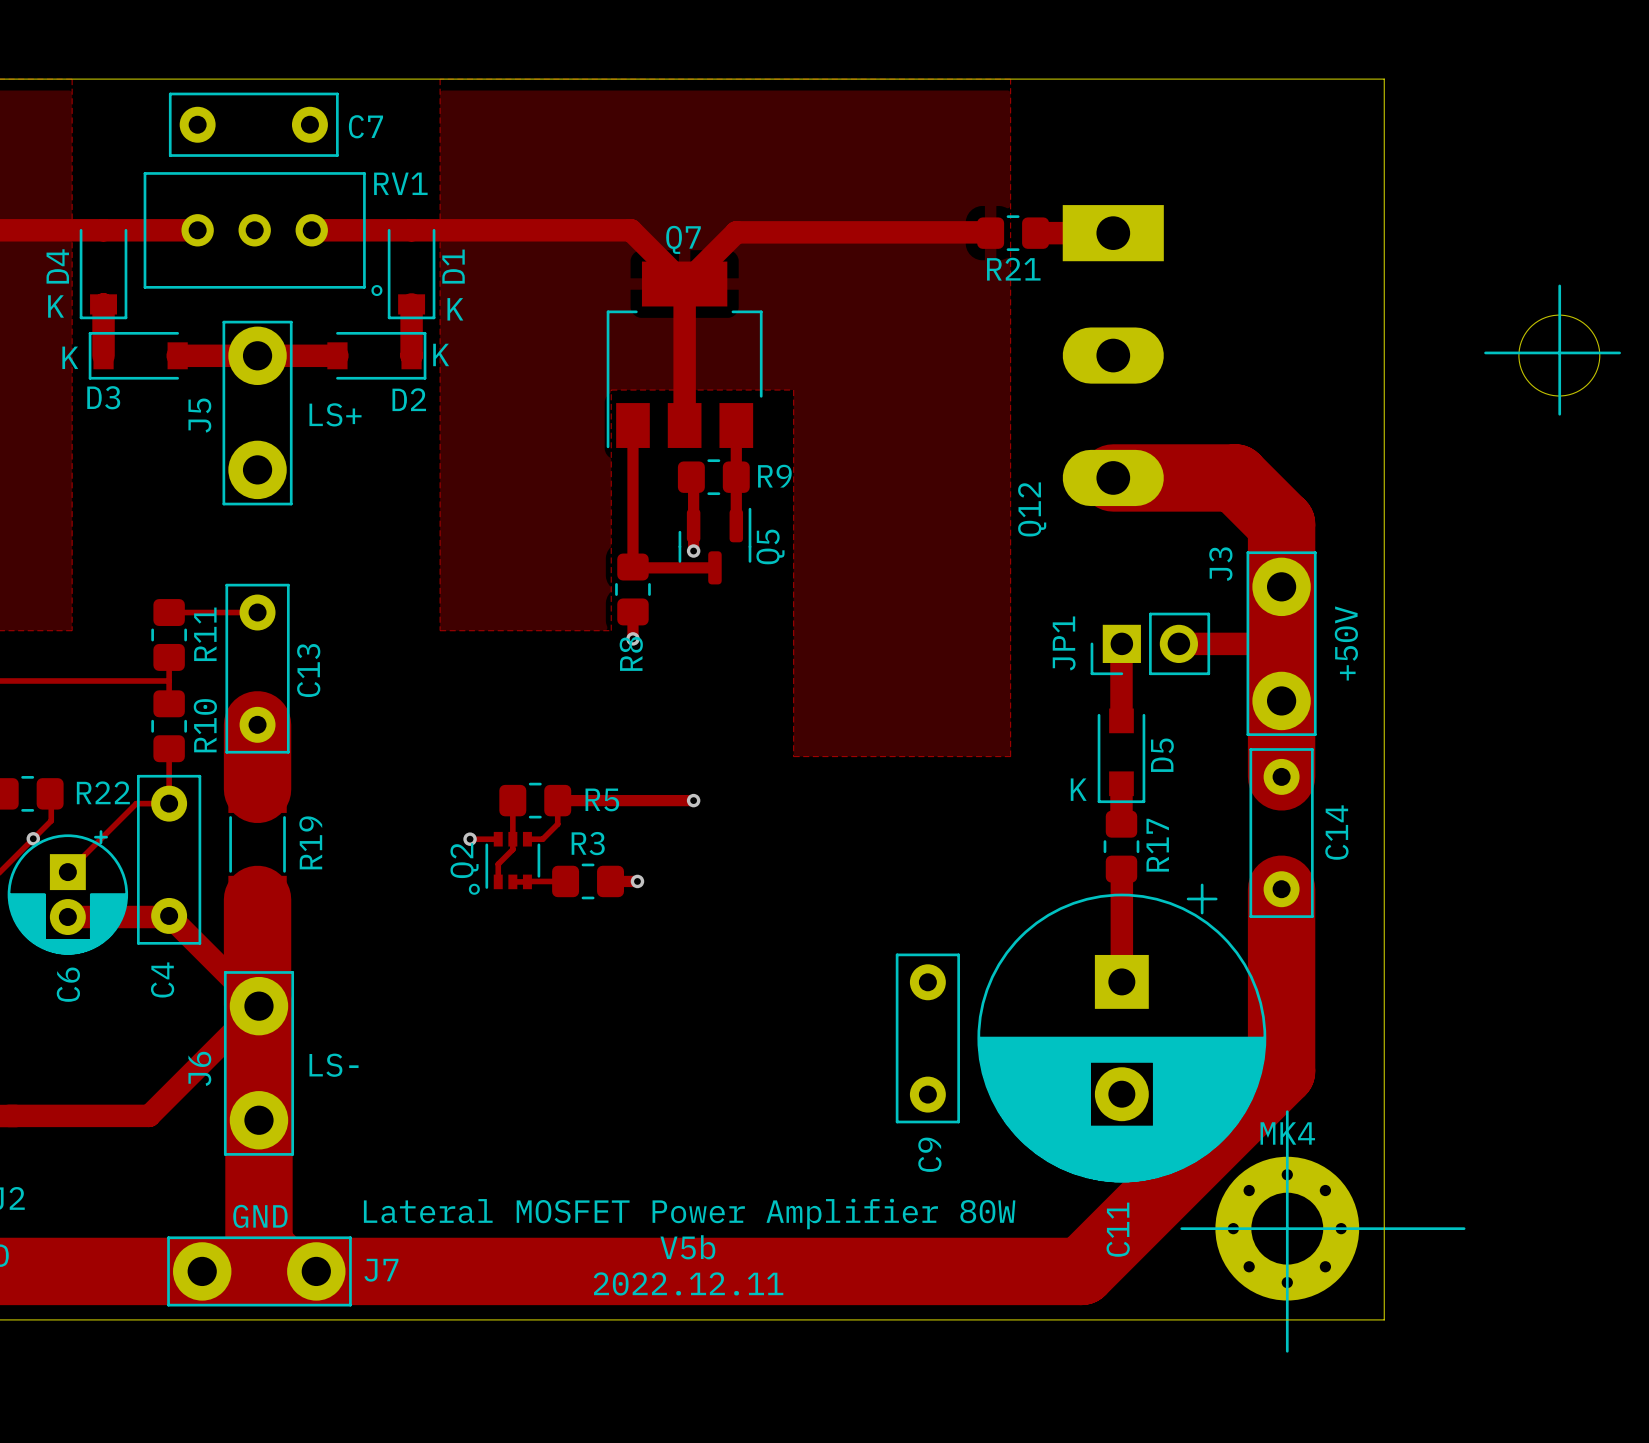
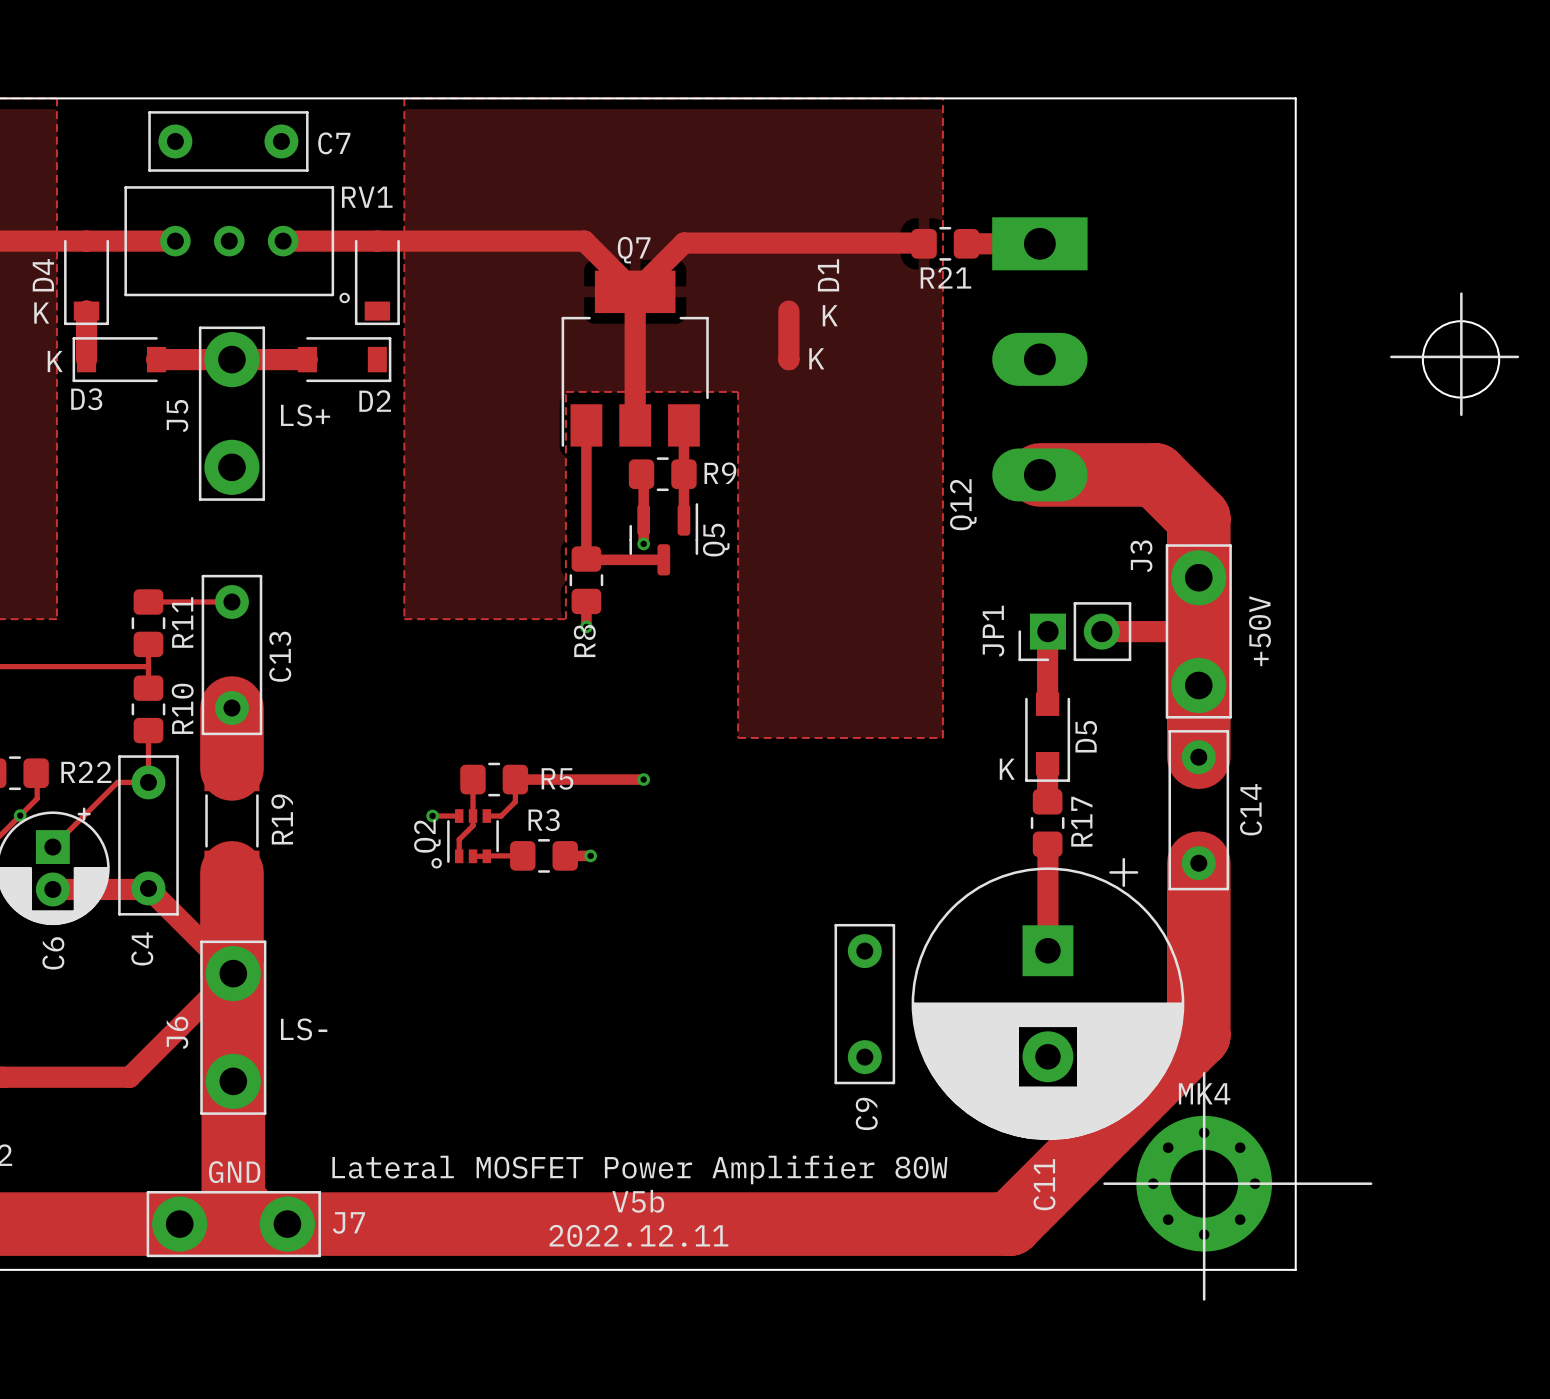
D1 name position: D1 (453, 266) -> D1 (828, 275)
track: (411, 304) (411, 355) -> (788, 311) (788, 359)
text: K (455, 309) -> none
text: none -> K (830, 315)
text: K (441, 354) -> none
text: none -> K (816, 358)

